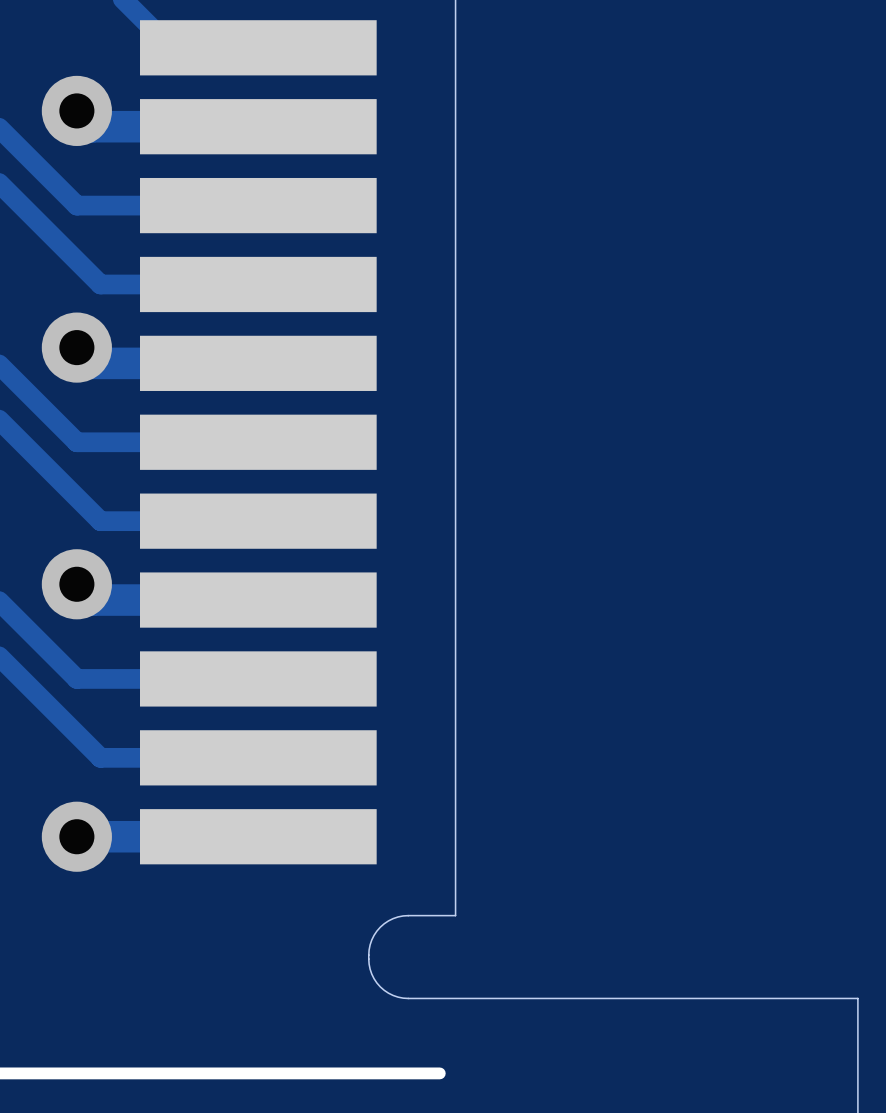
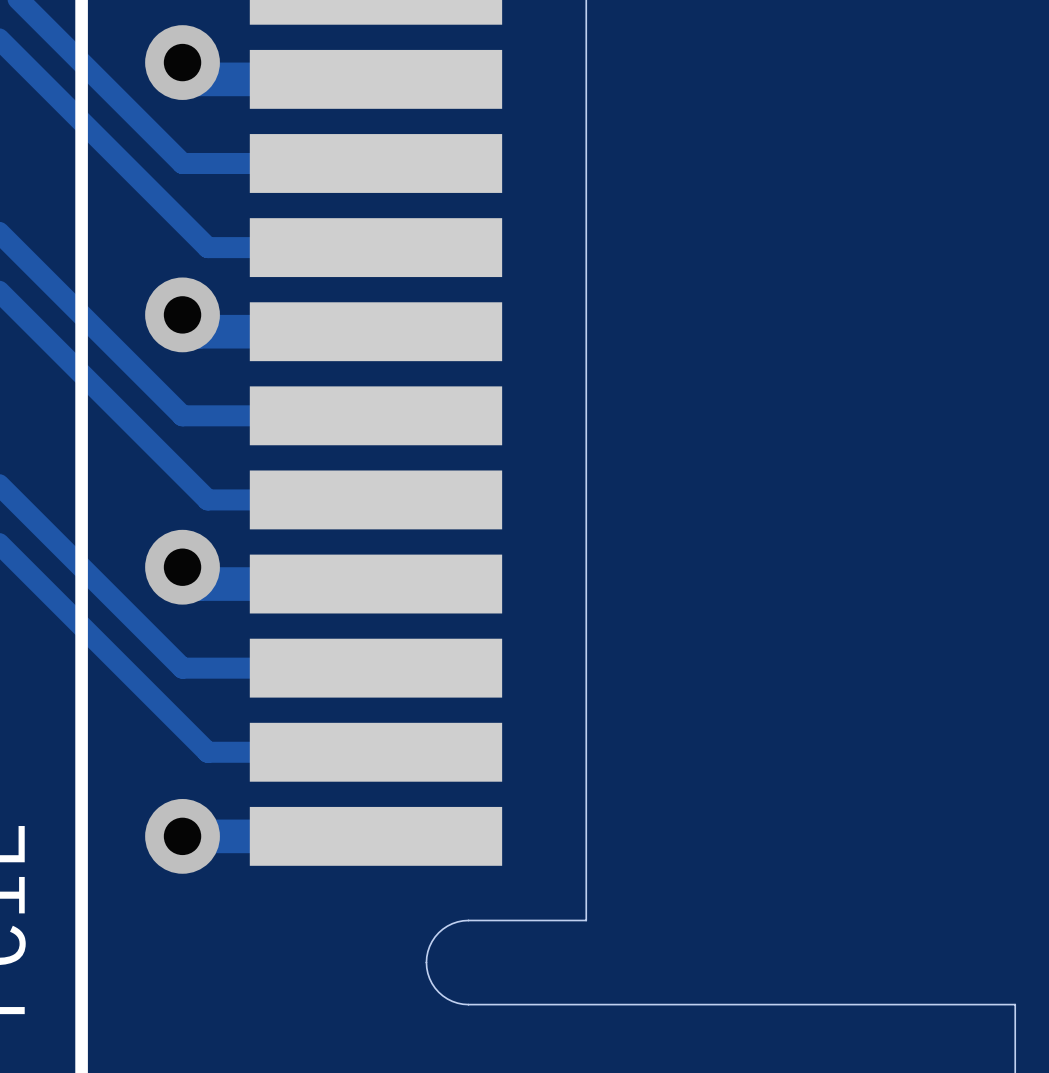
board edge: (408, 915) (393, 918) (380, 927) (371, 939) (368, 955) (370, 969) (376, 983) (388, 993) (403, 998) (857, 998) -> (535, 920) (468, 920) (447, 926) (435, 936) (427, 951) (426, 968) (432, 983) (447, 998) (468, 1004) (1015, 1004) (1015, 1008)

